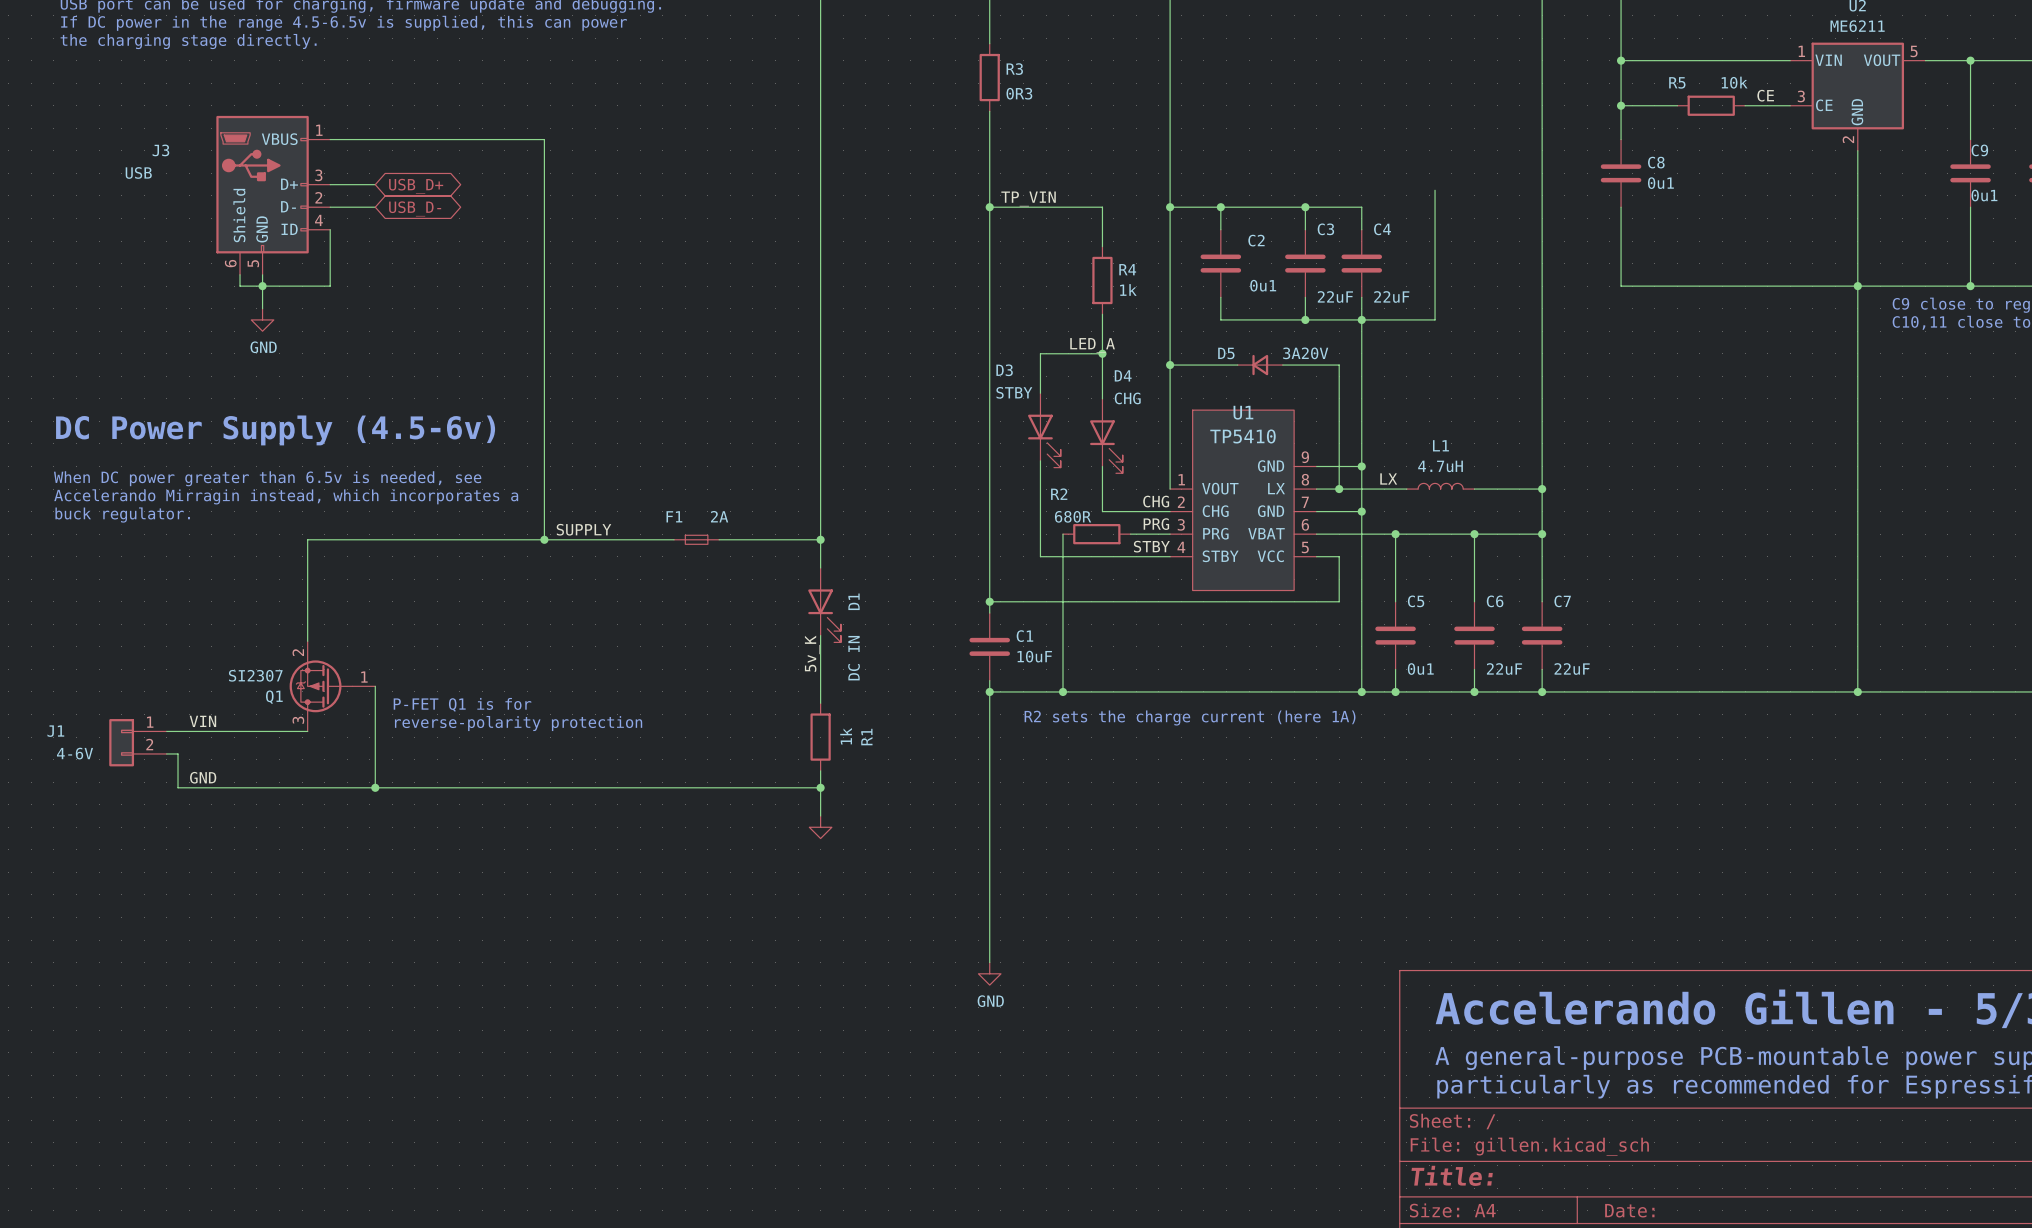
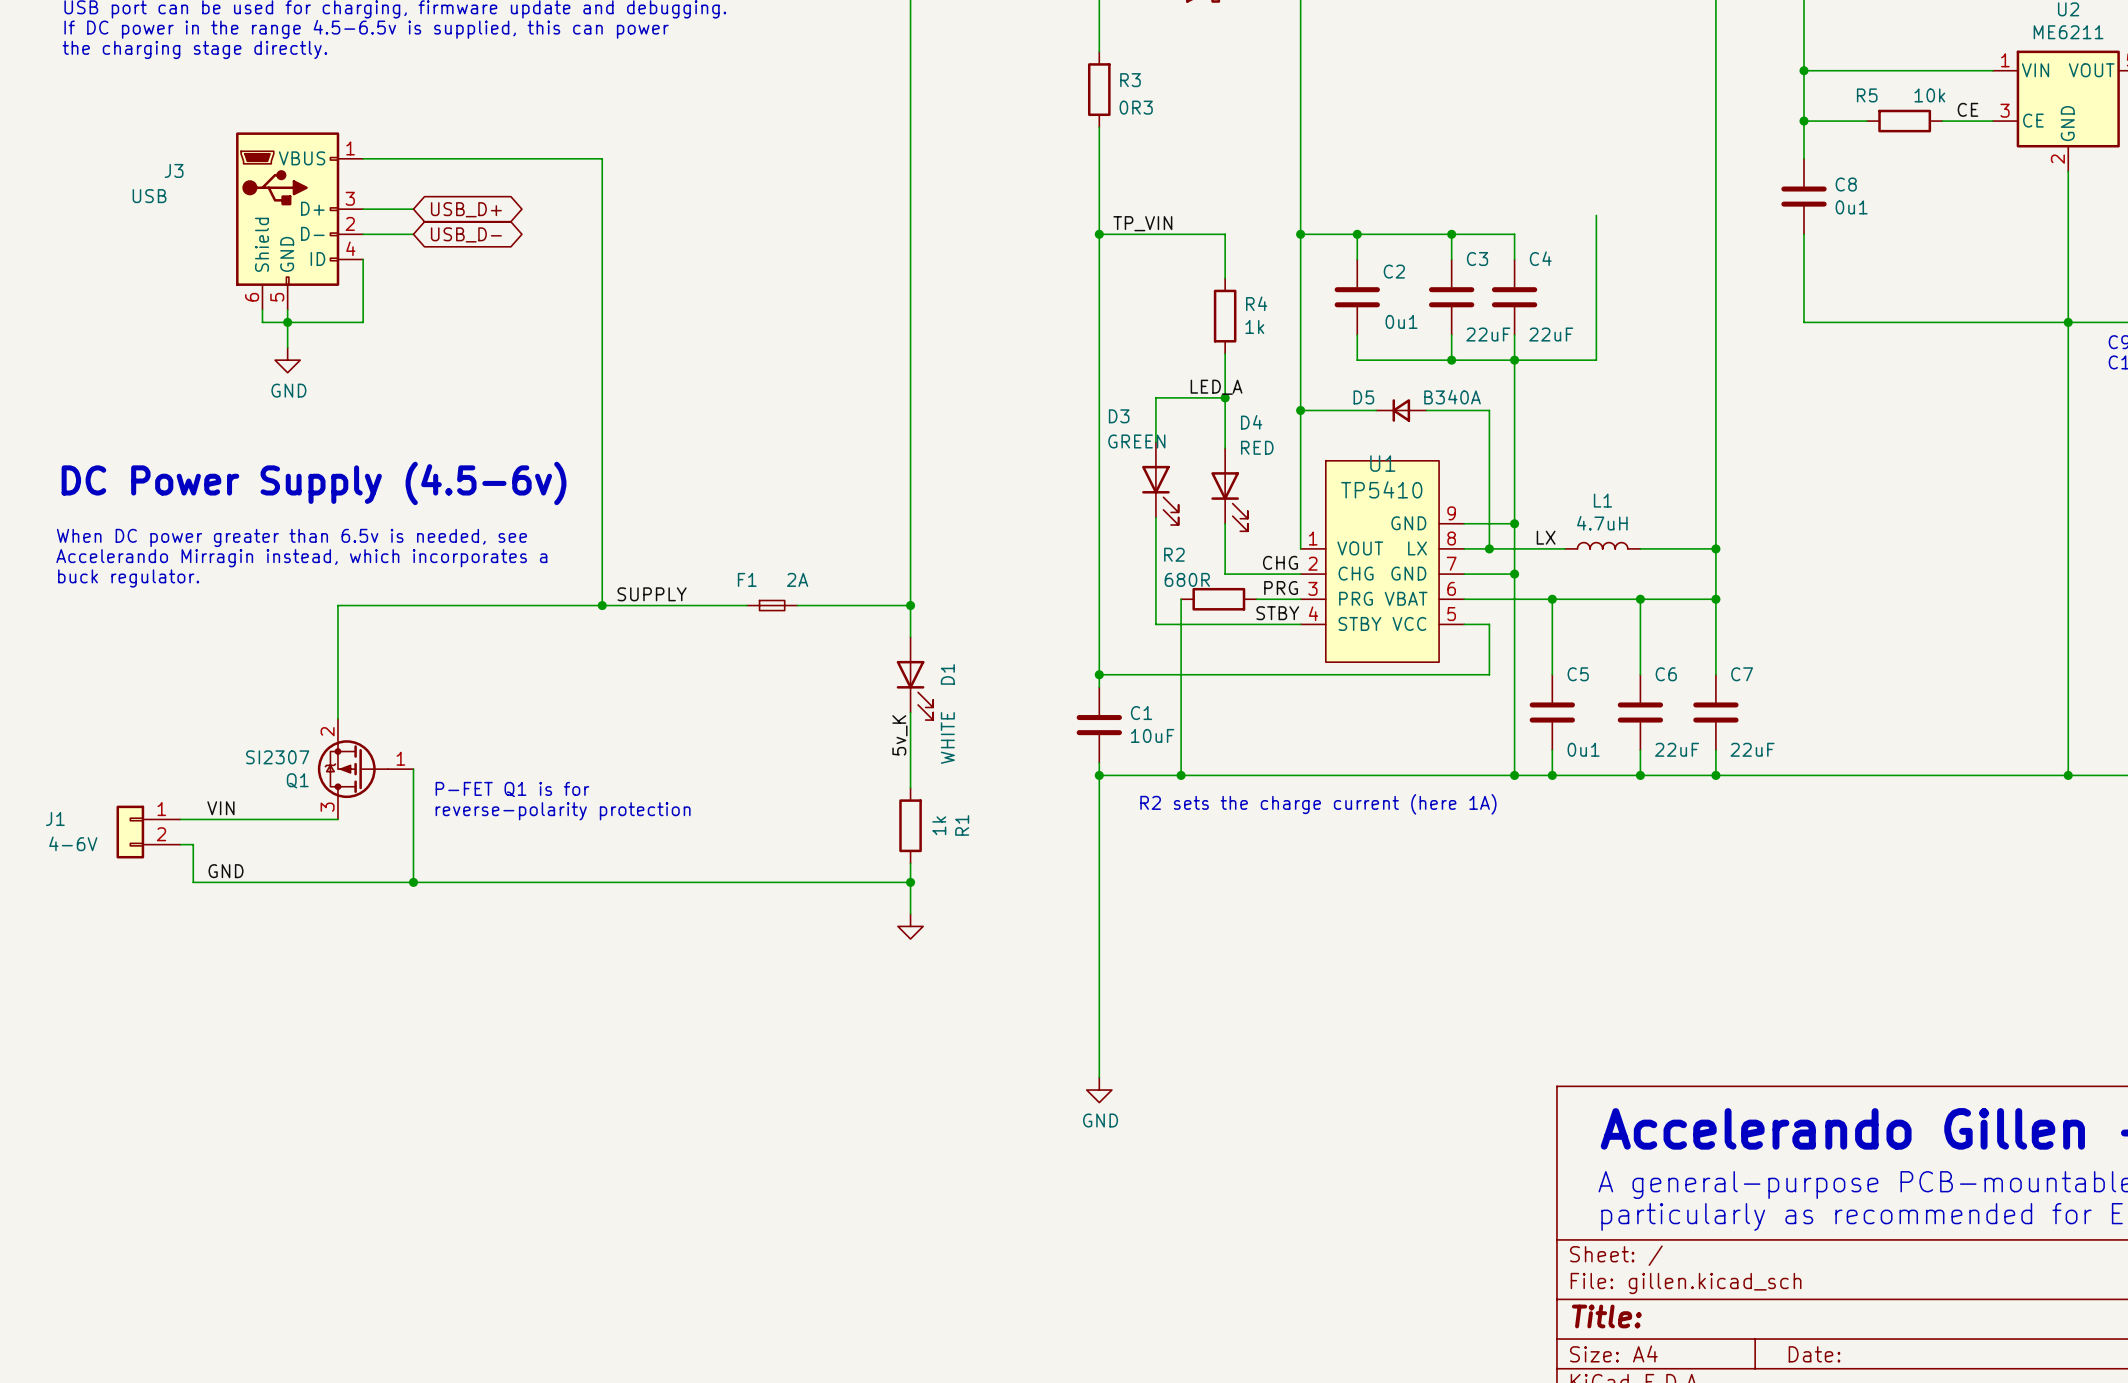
D5 value: 3A20V (1305, 353) -> B340A (1452, 397)
D3 value: STBY (1014, 392) -> GREEN (1136, 441)
D4 value: CHG (1127, 398) -> RED (1257, 447)
D1 value: DC IN (854, 658) -> WHITE (947, 737)

